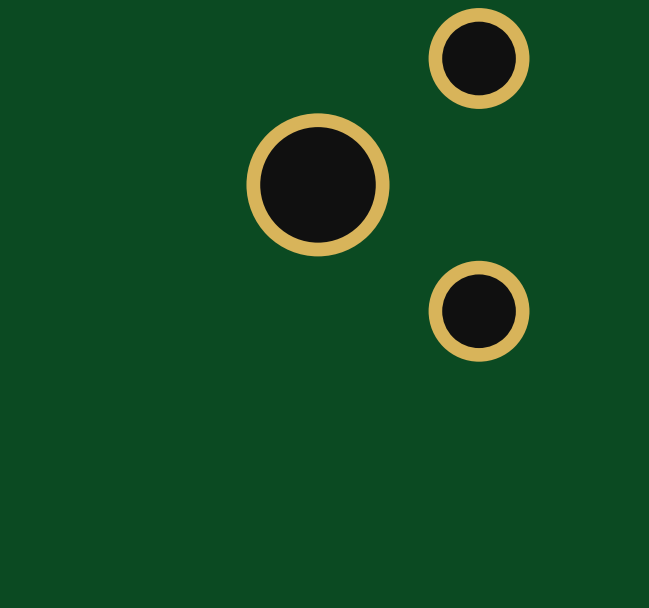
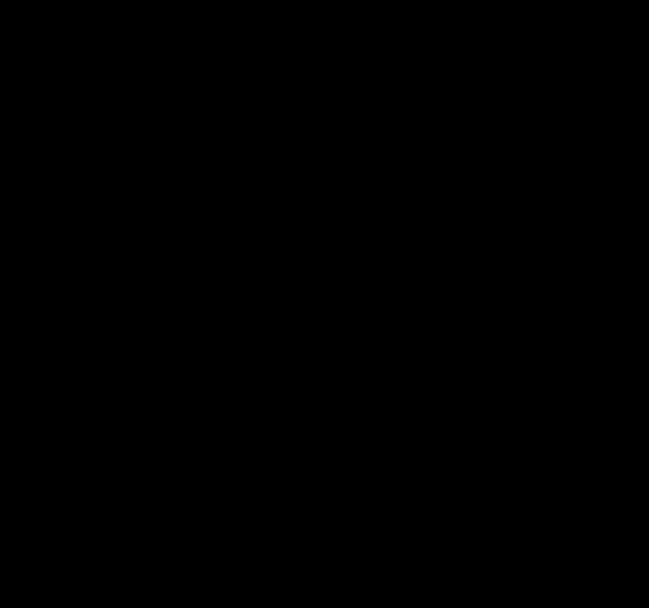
part: (387, 184) -> none

